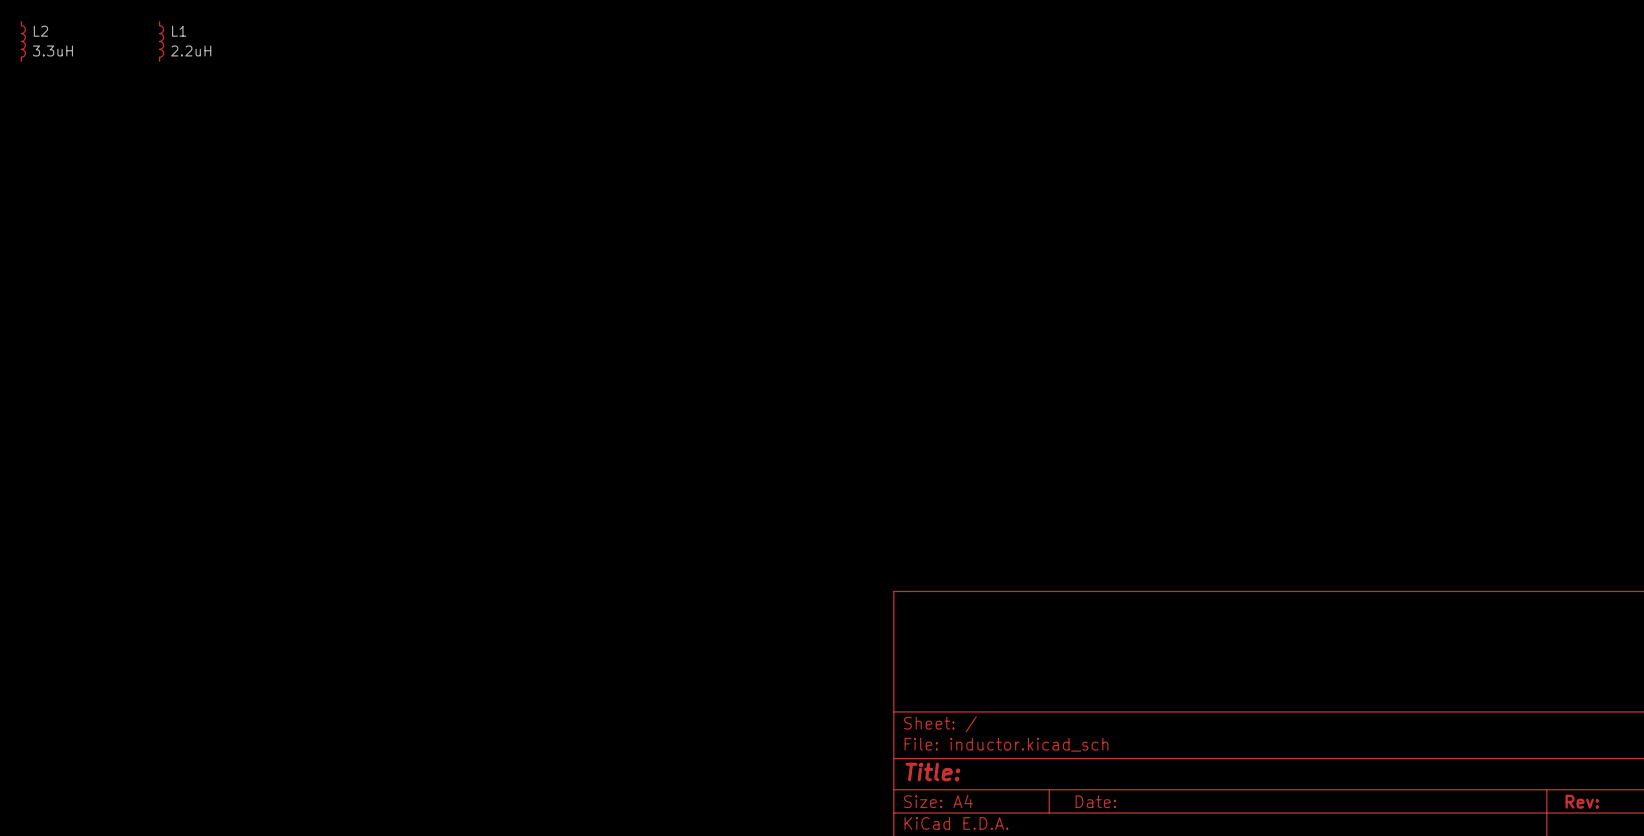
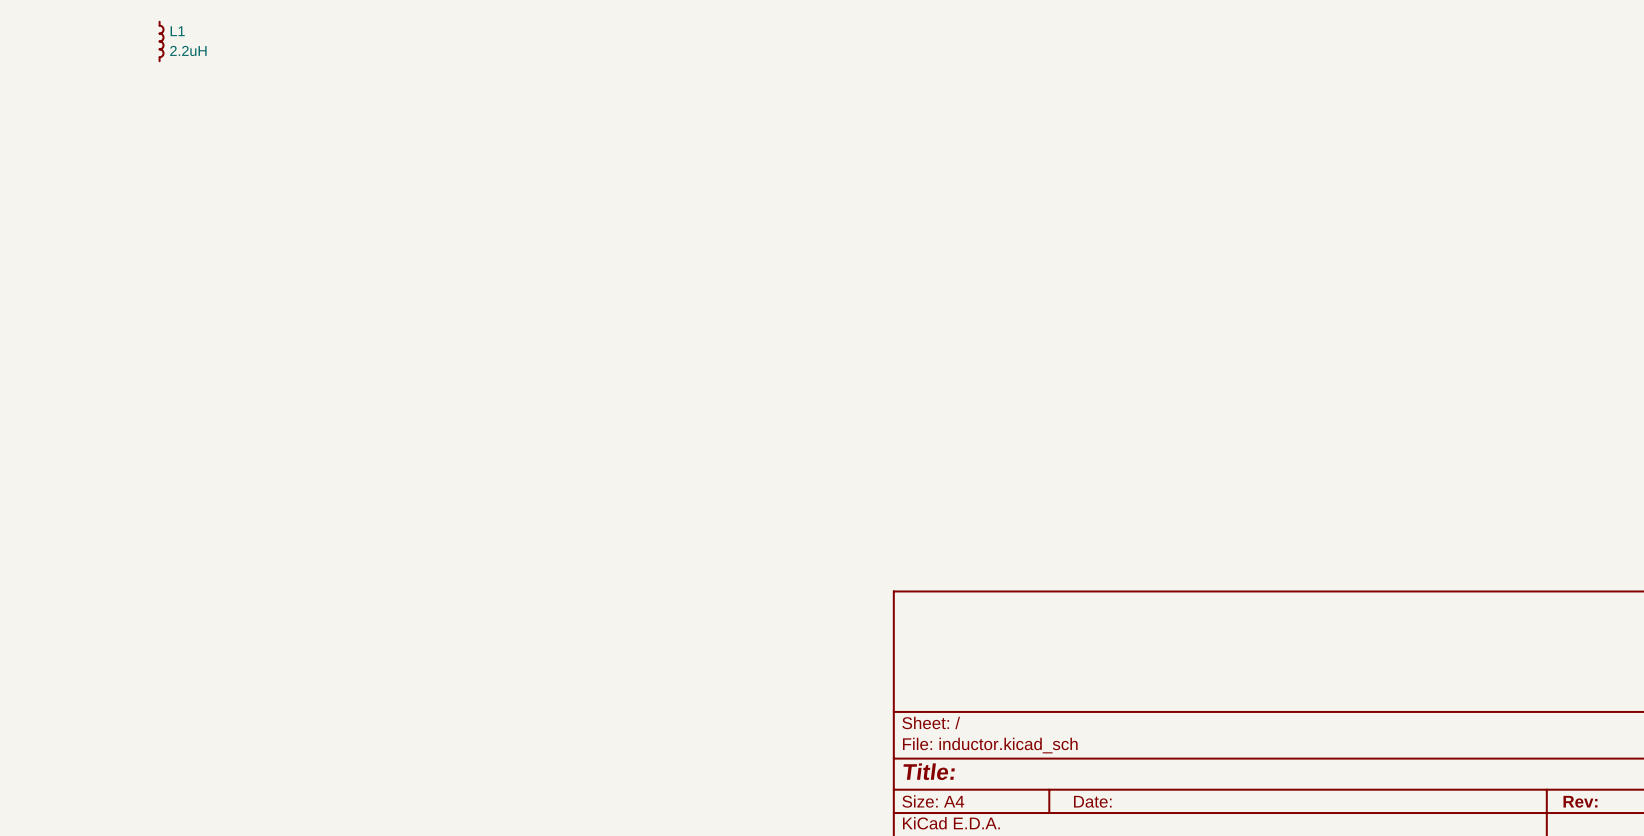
L2: 3.3uH (23, 41) -> none

